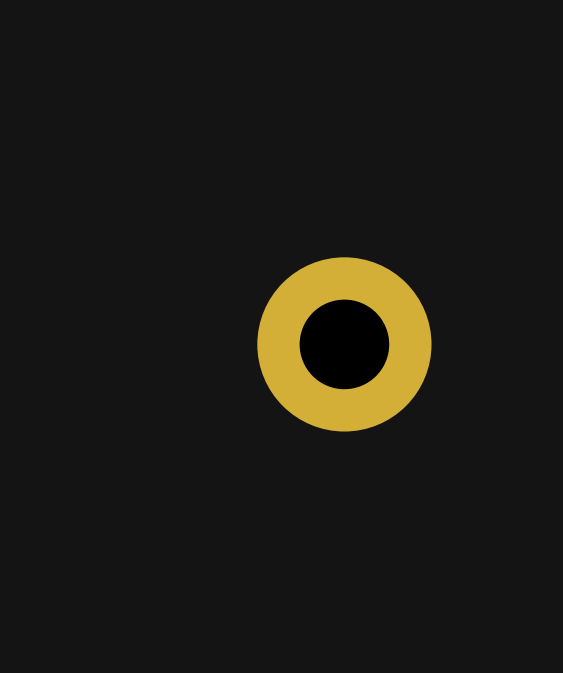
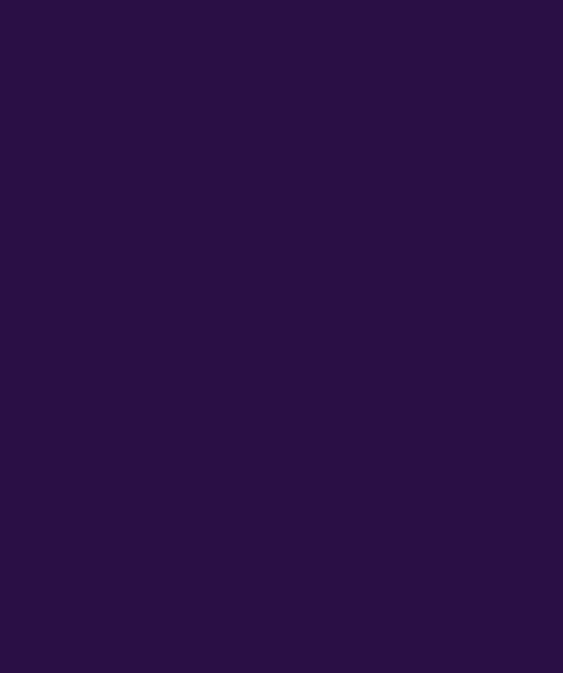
part: (344, 344) -> none

